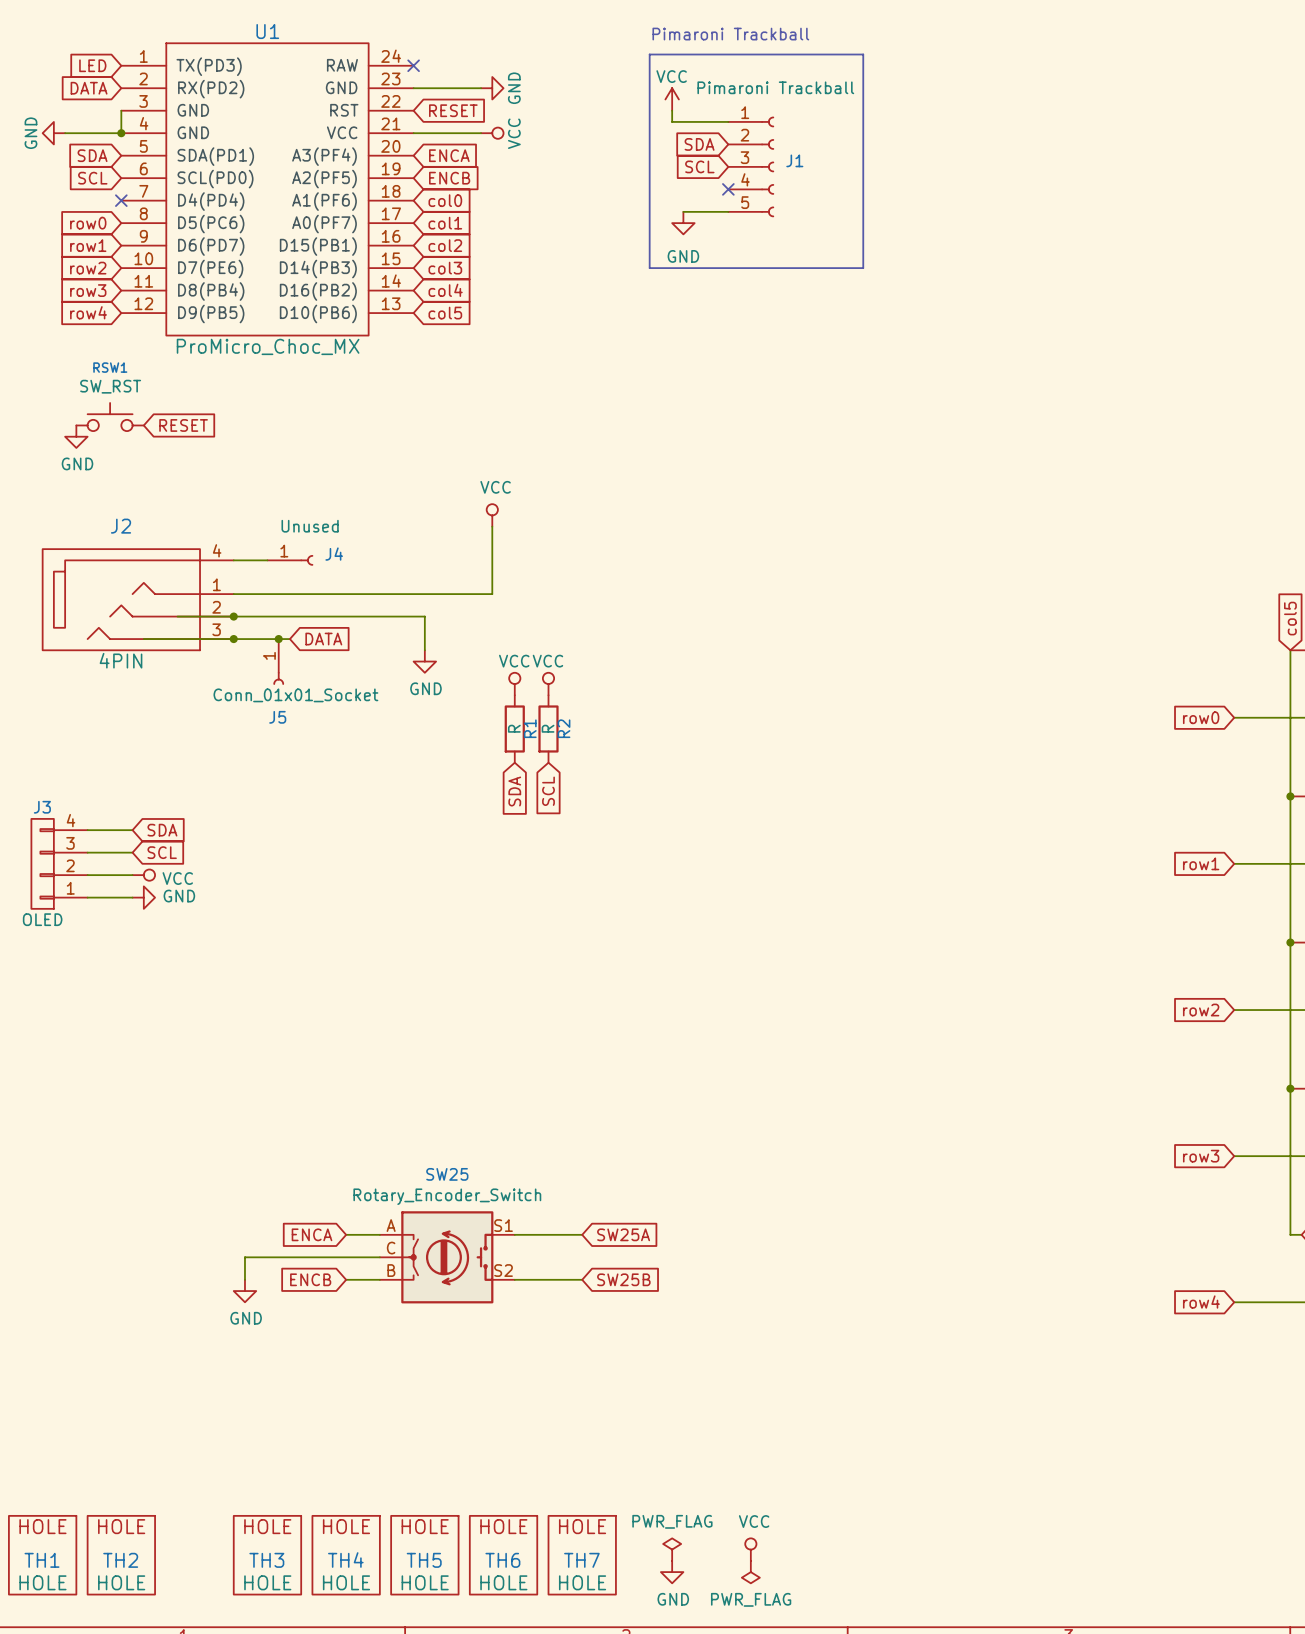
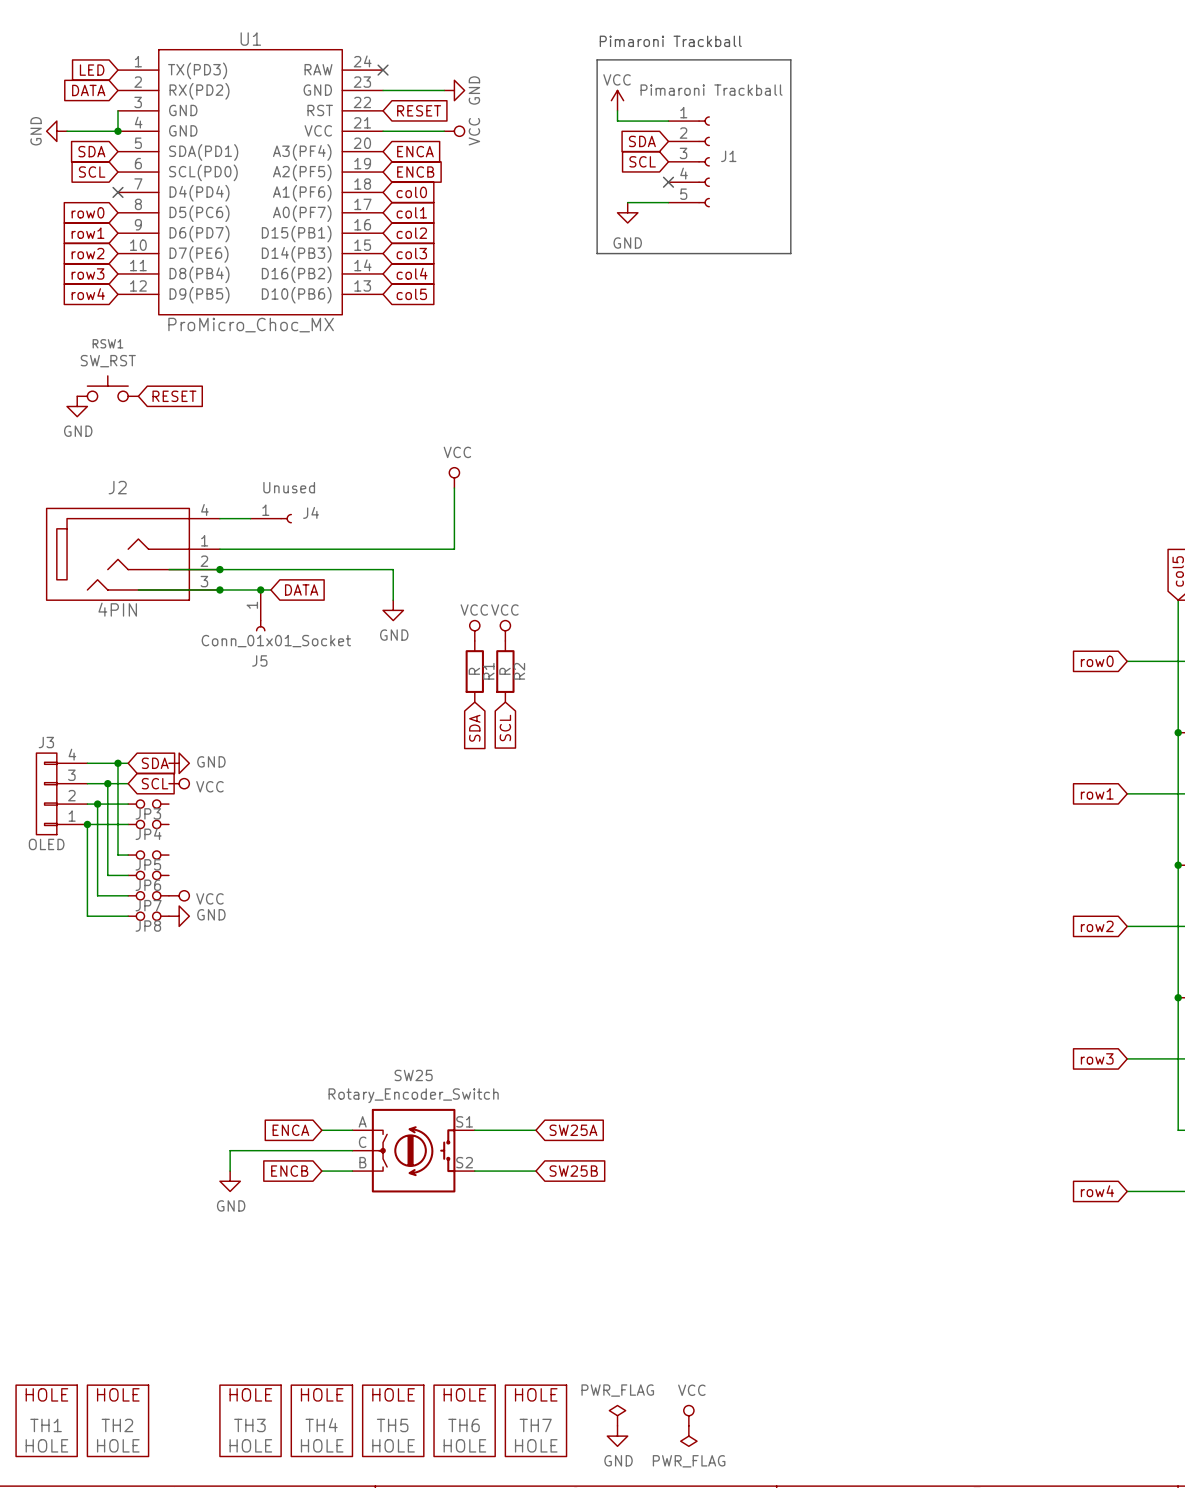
wire: none -> (117, 763) (117, 855) (128, 855)
junction: none -> (117, 763)
power symbol: none -> GND (179, 763)
wire: none -> (107, 783) (107, 875) (128, 875)
junction: none -> (107, 783)
wire: none -> (97, 804) (97, 895) (128, 895)
junction: none -> (97, 804)
power symbol position: VCC (143, 875) -> VCC (179, 783)
JP3: none -> (148, 804)
wire: none -> (87, 824) (87, 916) (128, 916)
junction: none -> (87, 824)
power symbol: GND (143, 897) -> none
JP4: none -> (148, 824)
JP5: none -> (148, 855)
JP6: none -> (148, 875)
JP7: none -> (148, 895)
power symbol: none -> VCC (179, 895)
JP8: none -> (148, 916)
power symbol: none -> GND (179, 916)

